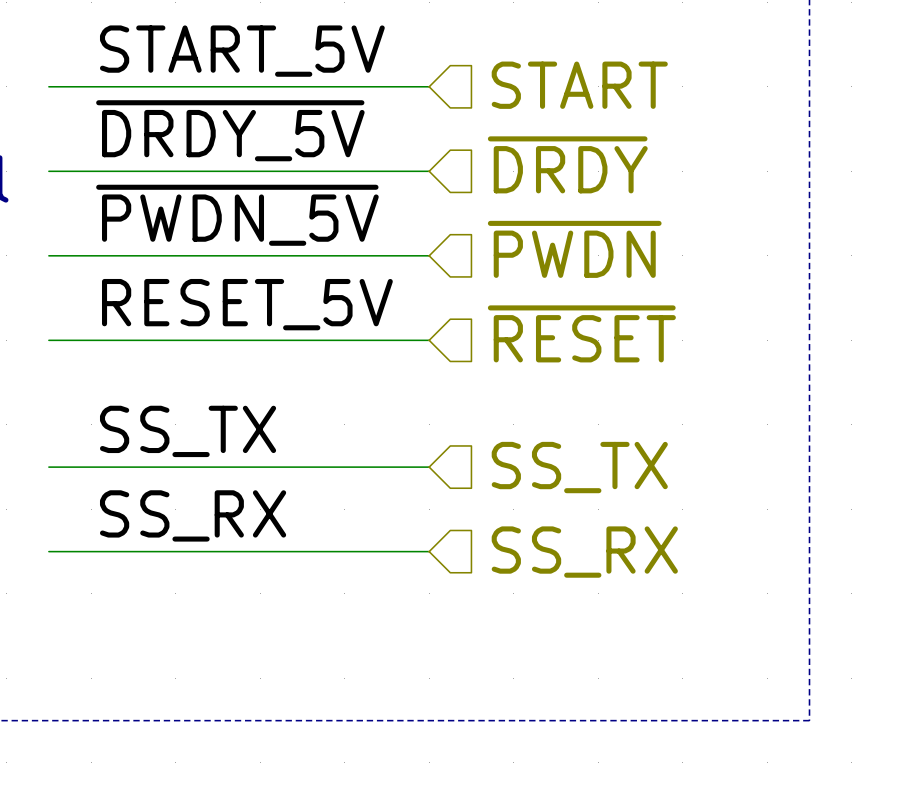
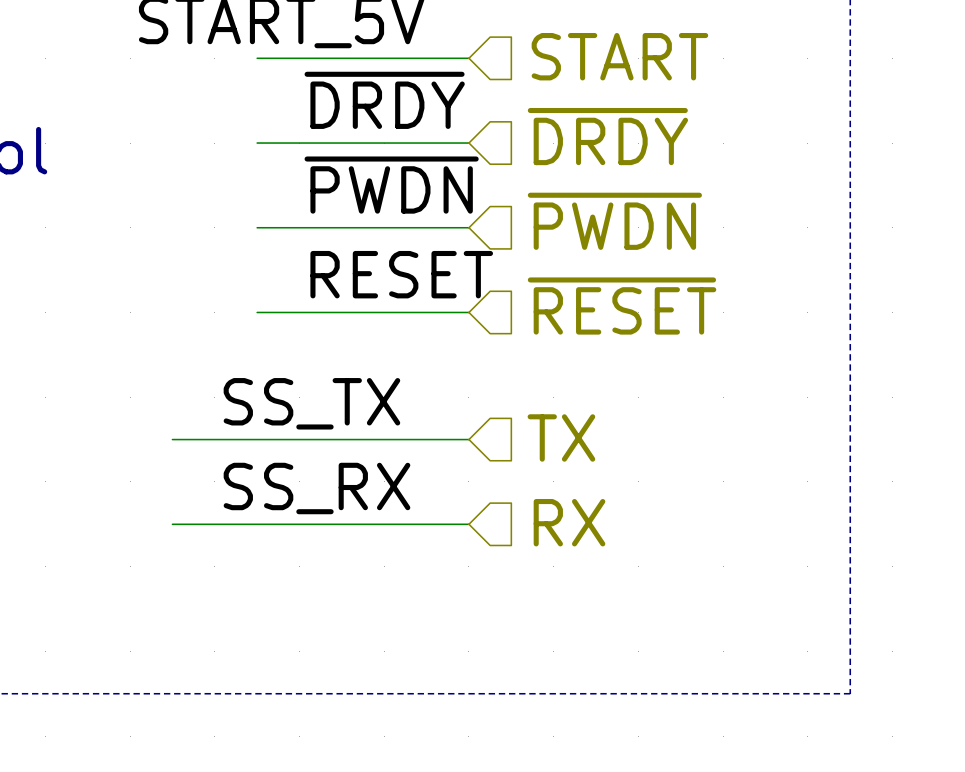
wire: (48, 86) (217, 86) -> none
label: ~{DRDY_5V} (230, 130) -> ~{DRDY} (384, 100)
wire: (48, 171) (217, 171) -> none
label: ~{PWDN_5V} (237, 215) -> ~{PWDN} (391, 185)
wire: (48, 255) (217, 255) -> none
label: RESET_5V (247, 304) -> RESET (401, 274)
wire: (48, 340) (217, 340) -> none
label position: SS_TX (188, 431) -> SS_TX (311, 403)
wire: (48, 467) (133, 467) -> none
hierarchical label: SS_TX (579, 467) -> TX (561, 437)
label position: SS_RX (193, 515) -> SS_RX (316, 488)
wire: (48, 551) (133, 551) -> none
hierarchical label: SS_RX (584, 552) -> RX (569, 522)

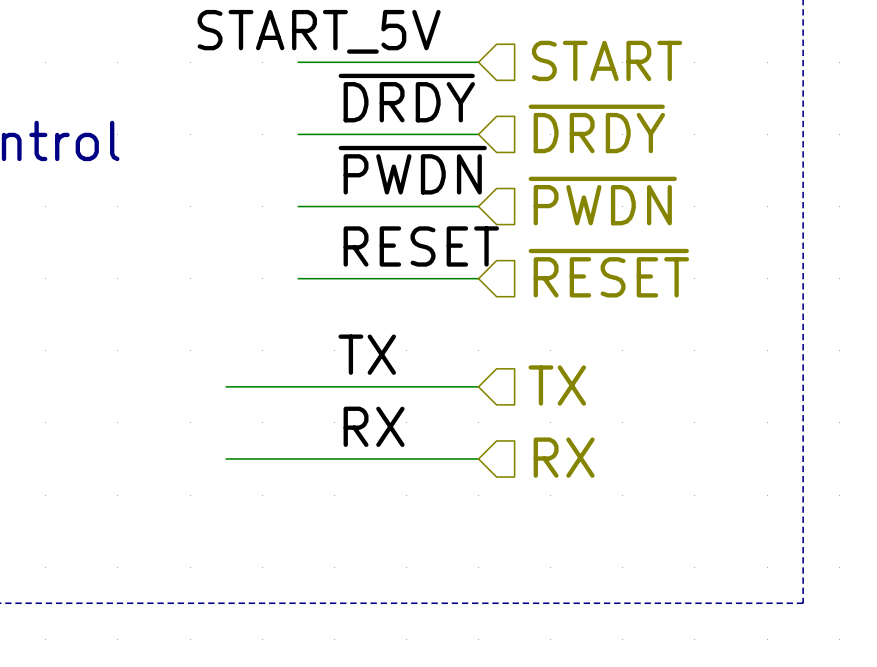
label: none -> TX (367, 354)
label: SS_TX (311, 403) -> none
label: none -> RX (374, 426)
label: SS_RX (316, 488) -> none

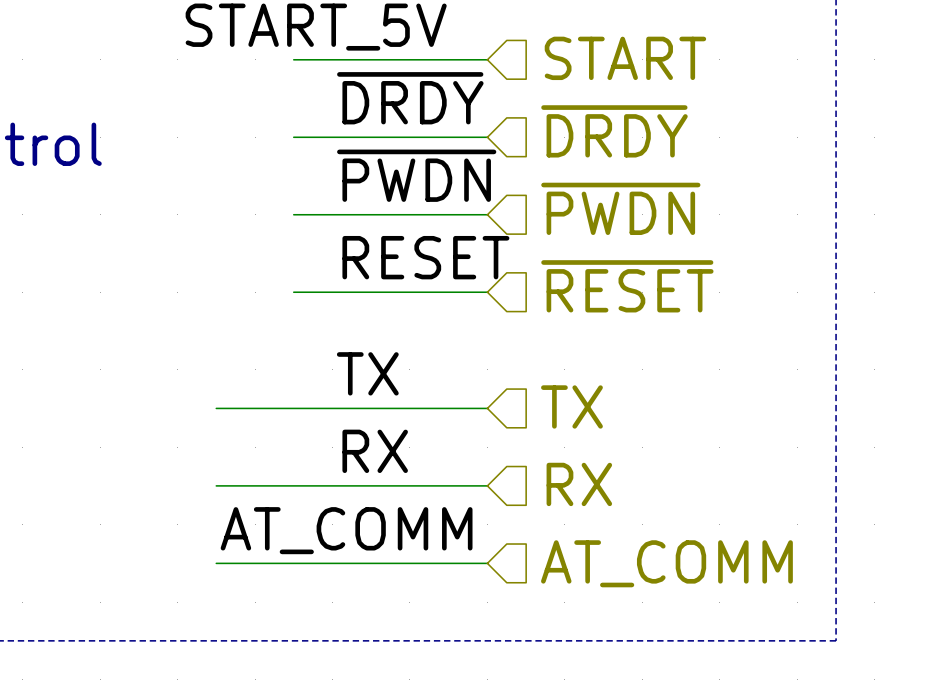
label: none -> AT_COMM (346, 530)
wire: none -> (216, 563) (487, 563)
hierarchical label: none -> AT_COMM (666, 563)

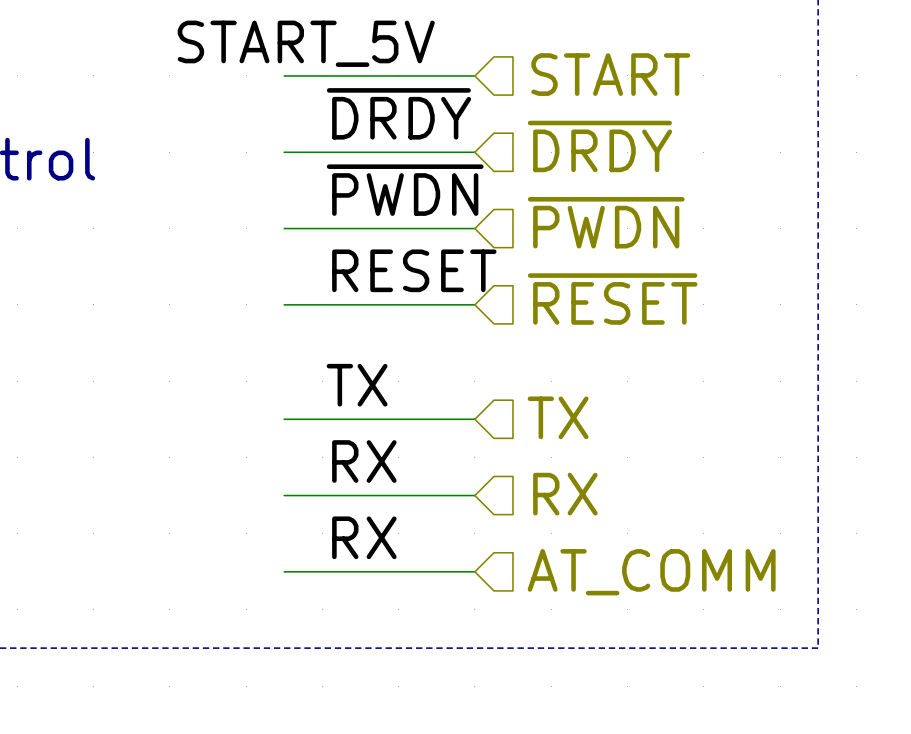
wire: (216, 408) (293, 408) -> none
wire: (216, 485) (293, 485) -> none
label: none -> RX (364, 537)
label: AT_COMM (346, 530) -> none
wire: (216, 563) (293, 563) -> none

